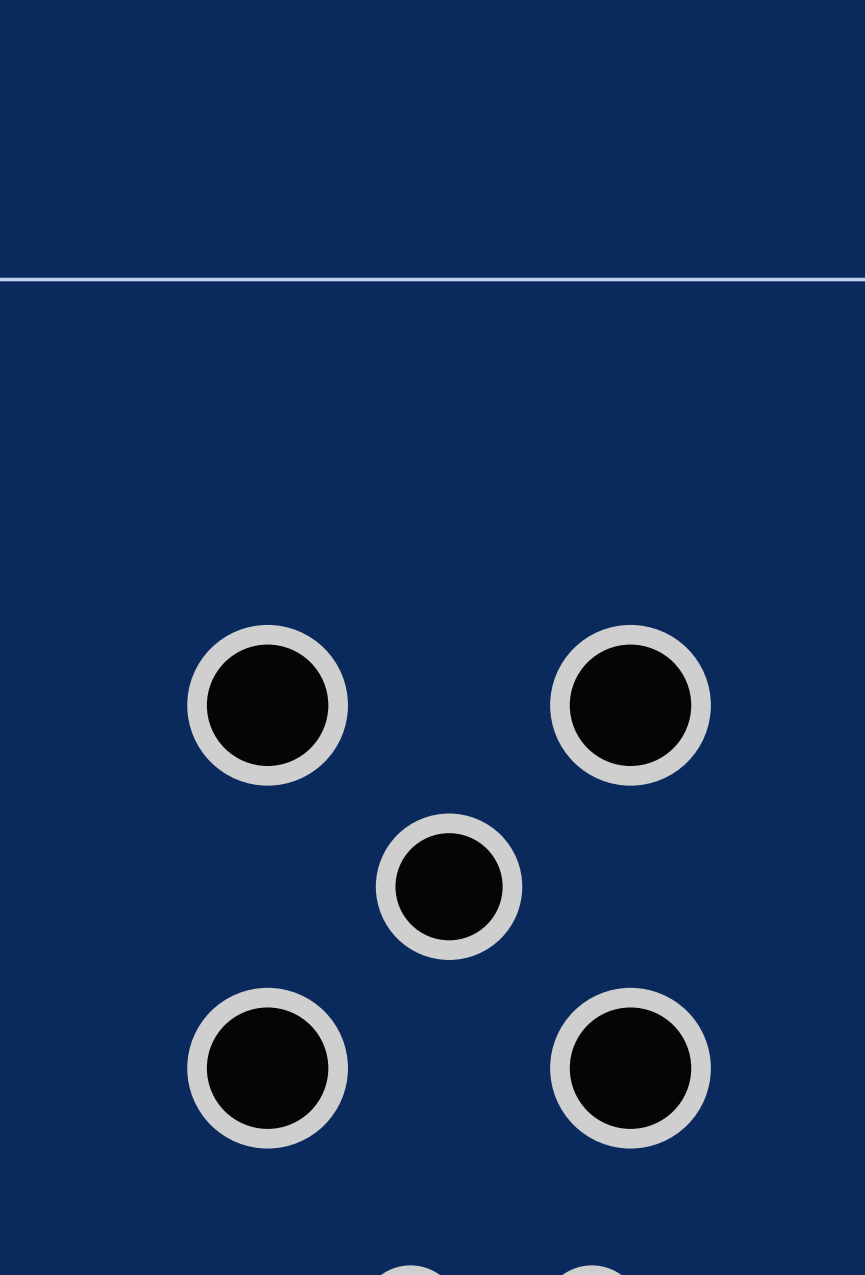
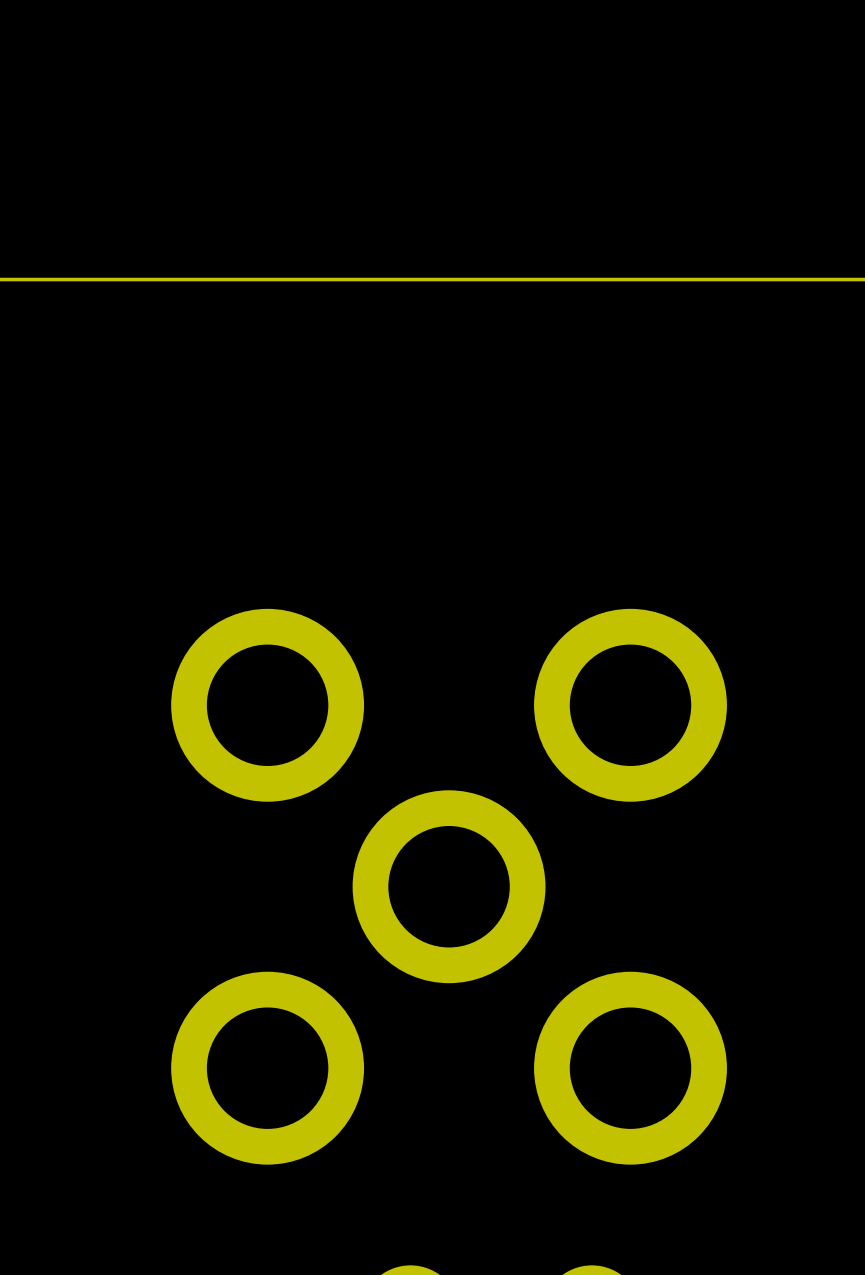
part footprint: [187, 624, 711, 1149] -> [171, 608, 727, 1165]

